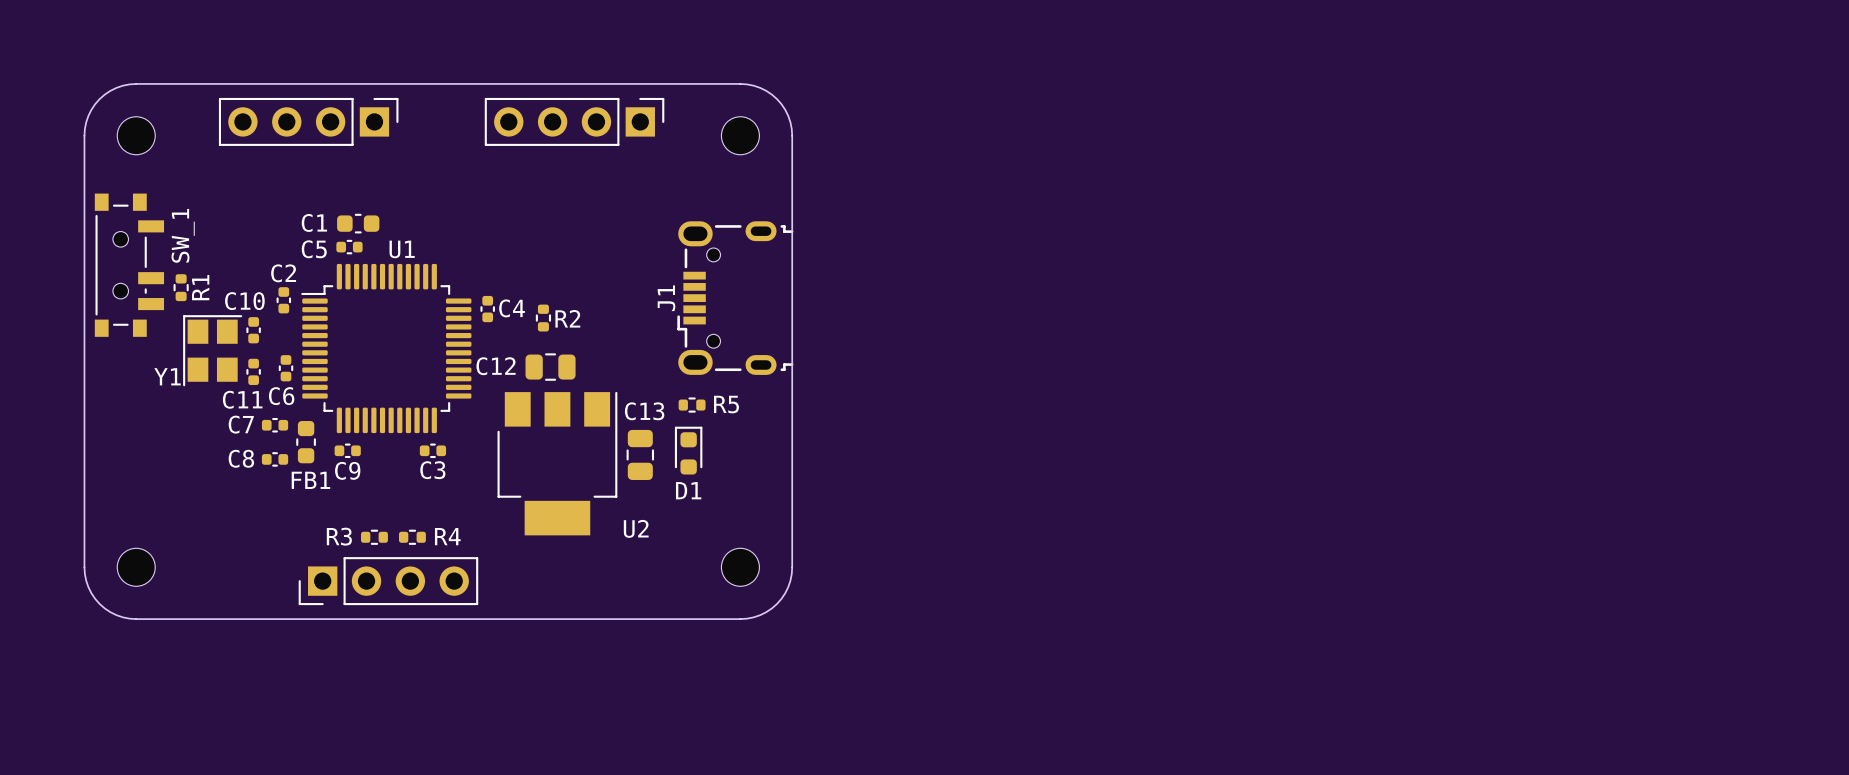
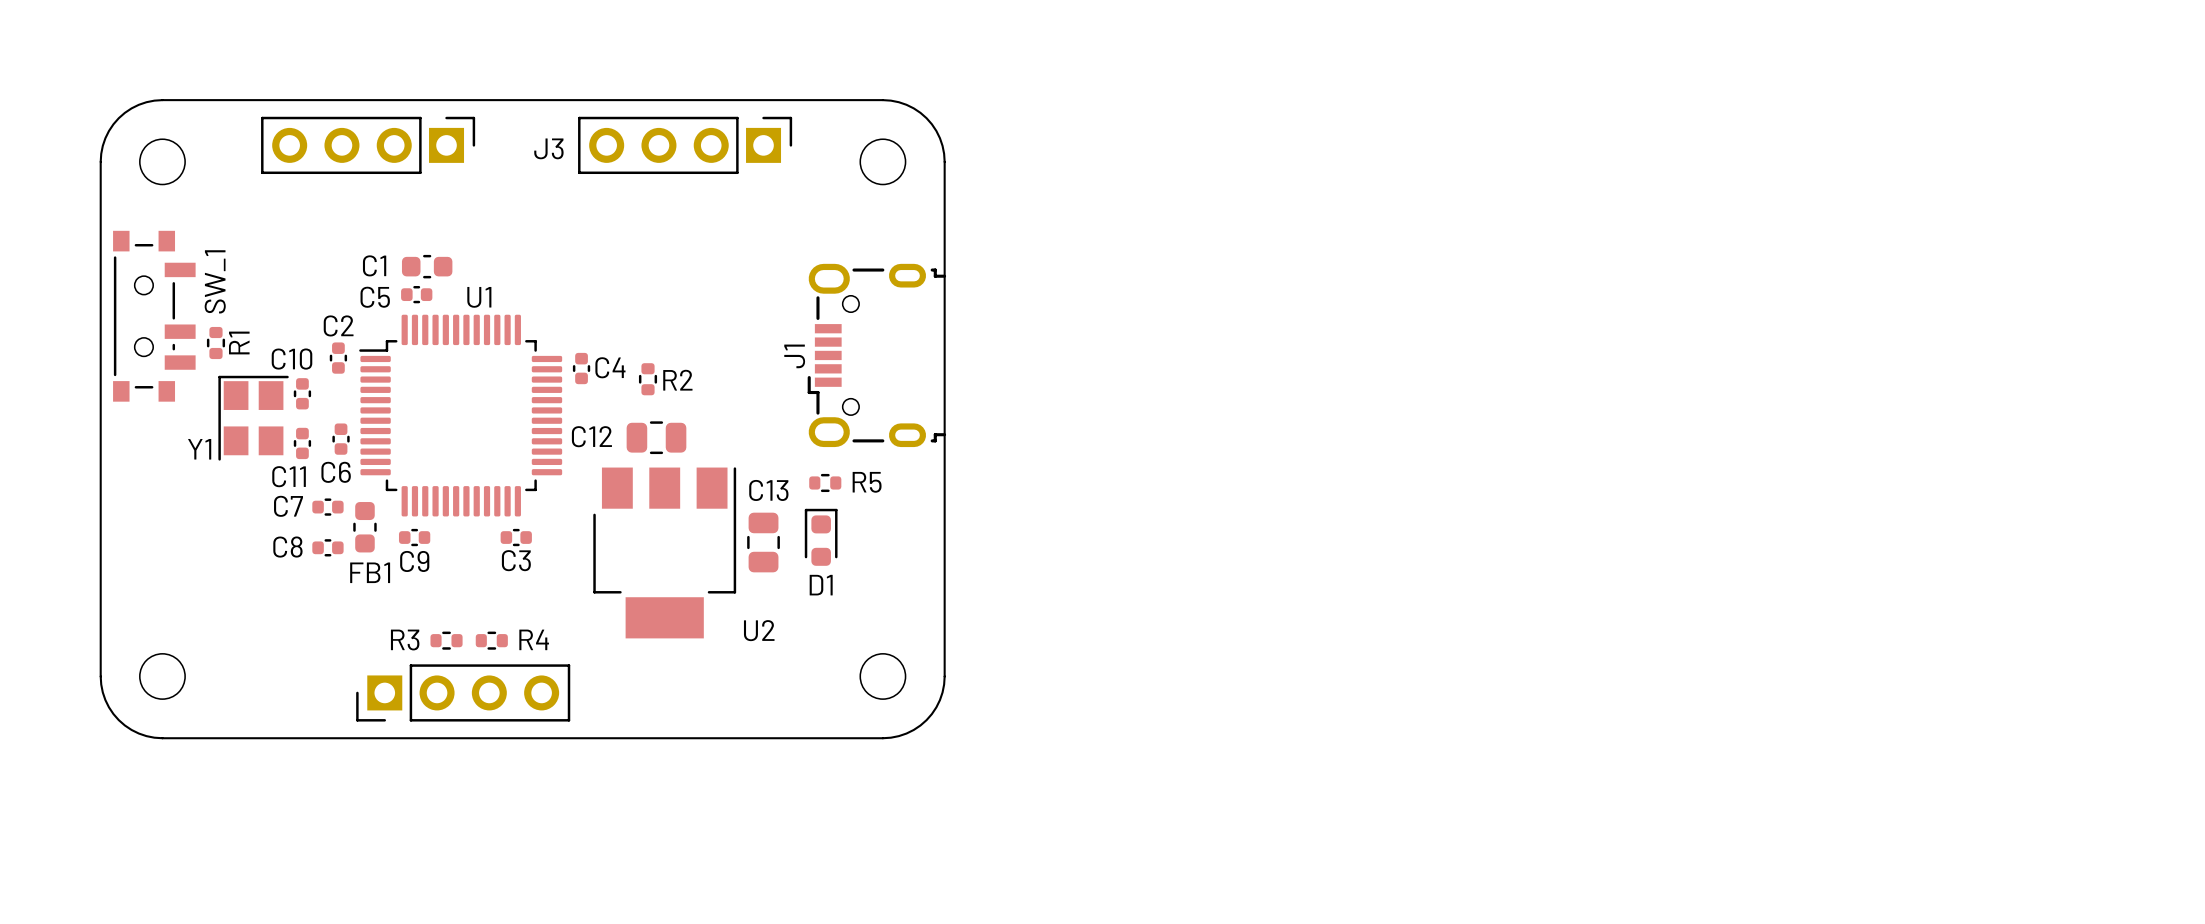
J3 name: none -> J3 (548, 148)

